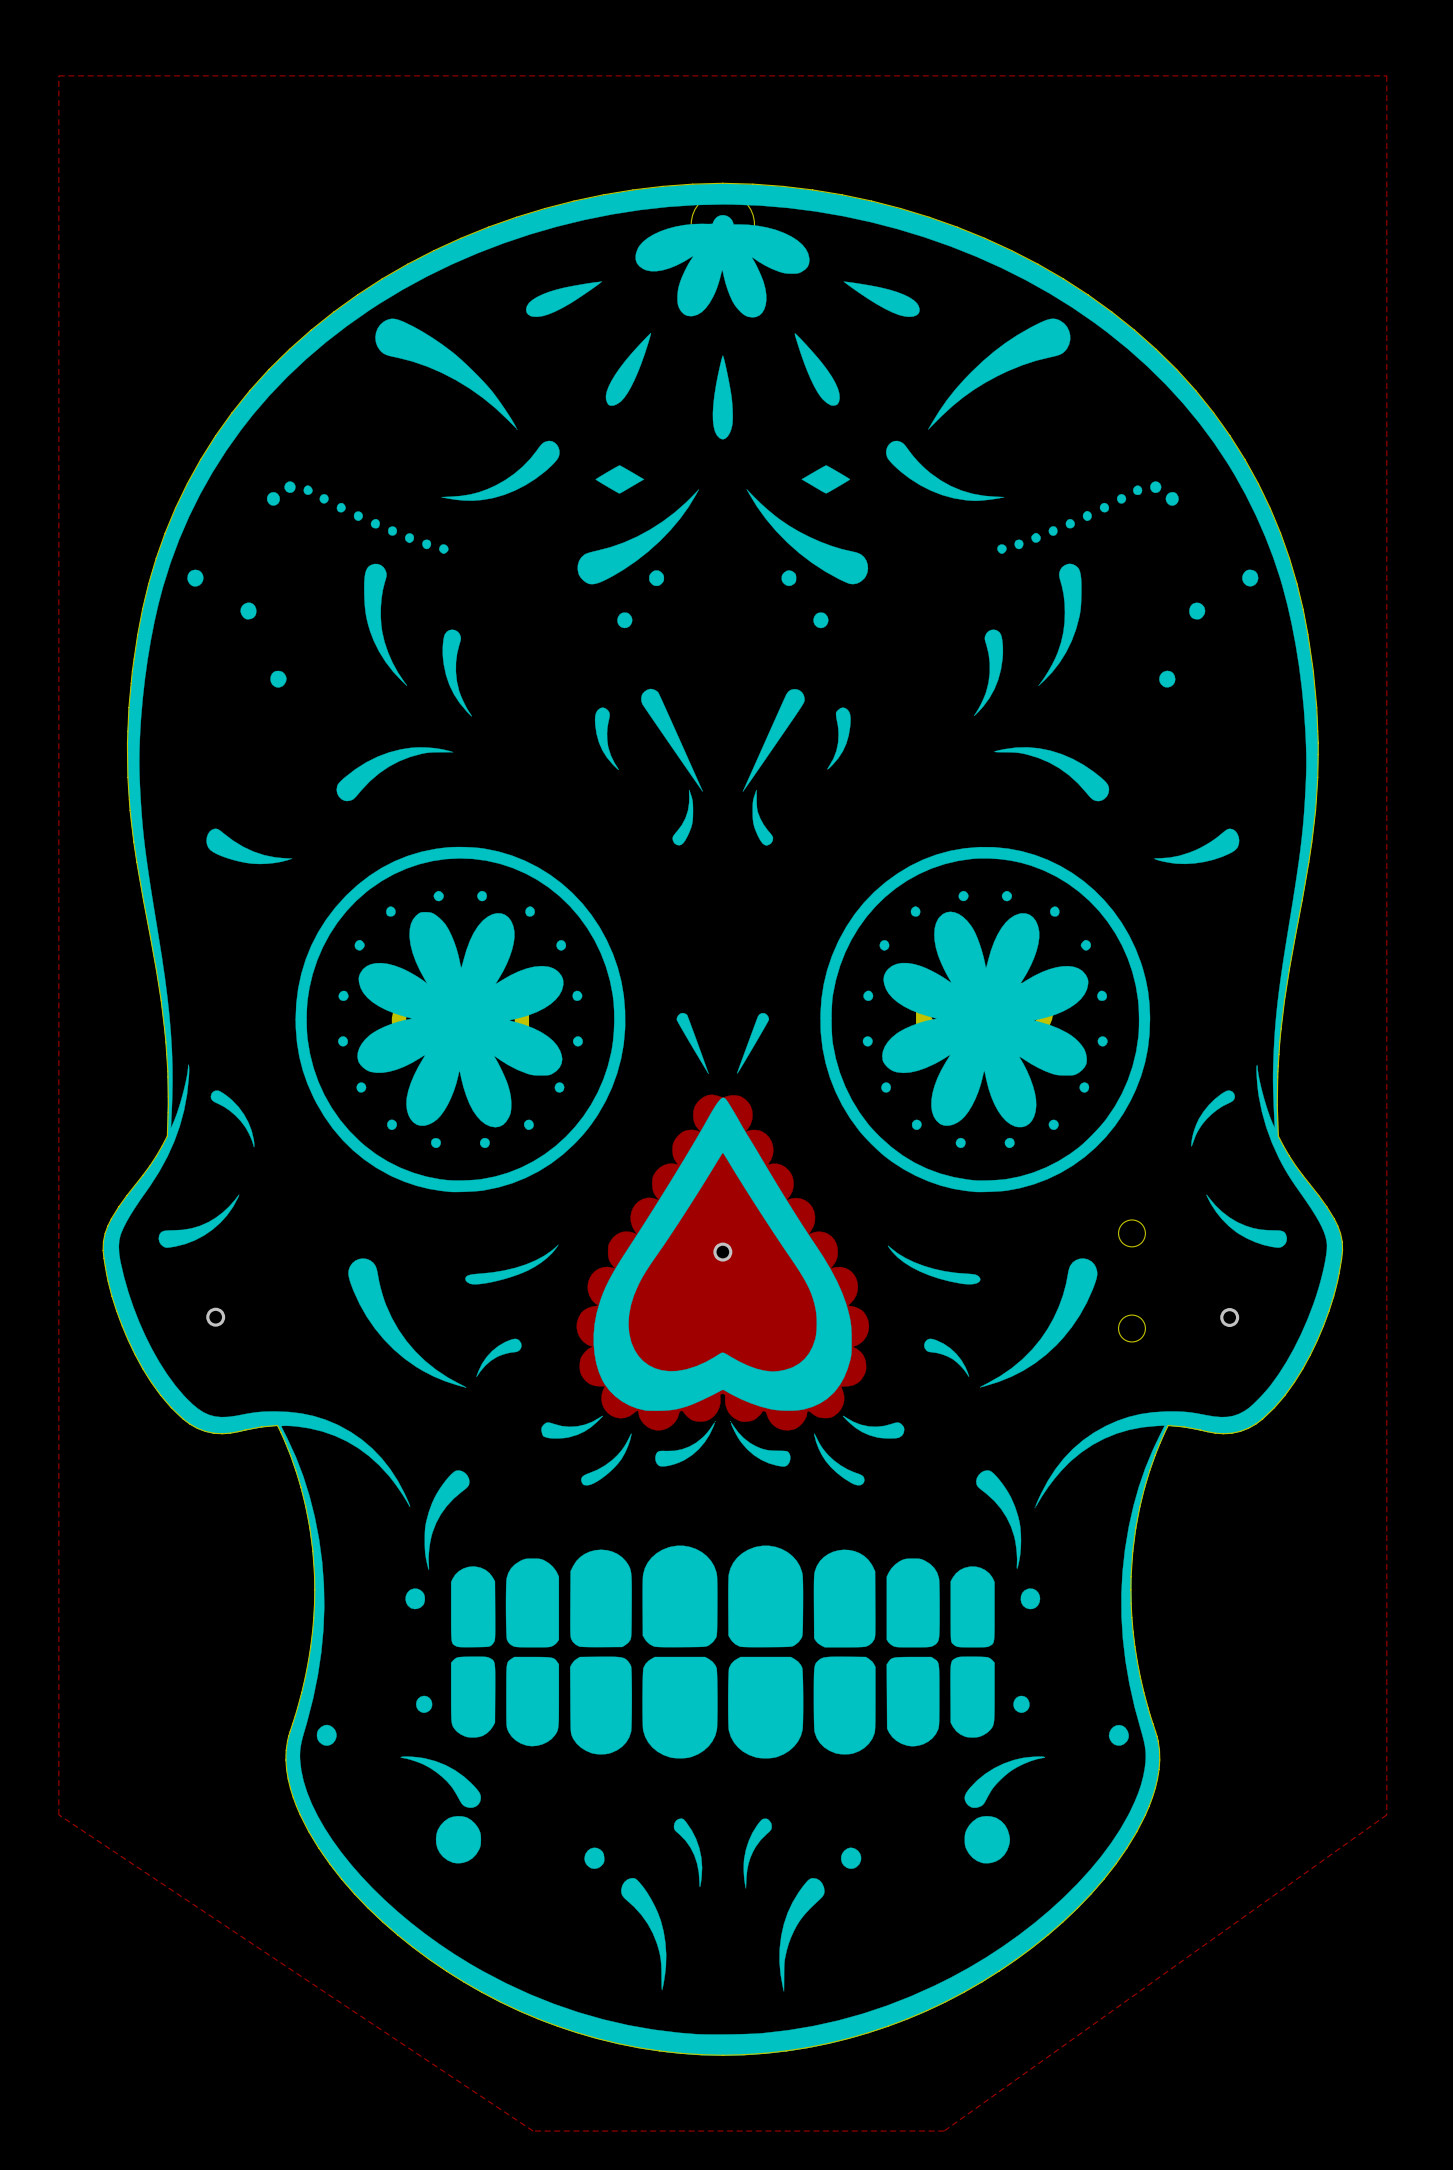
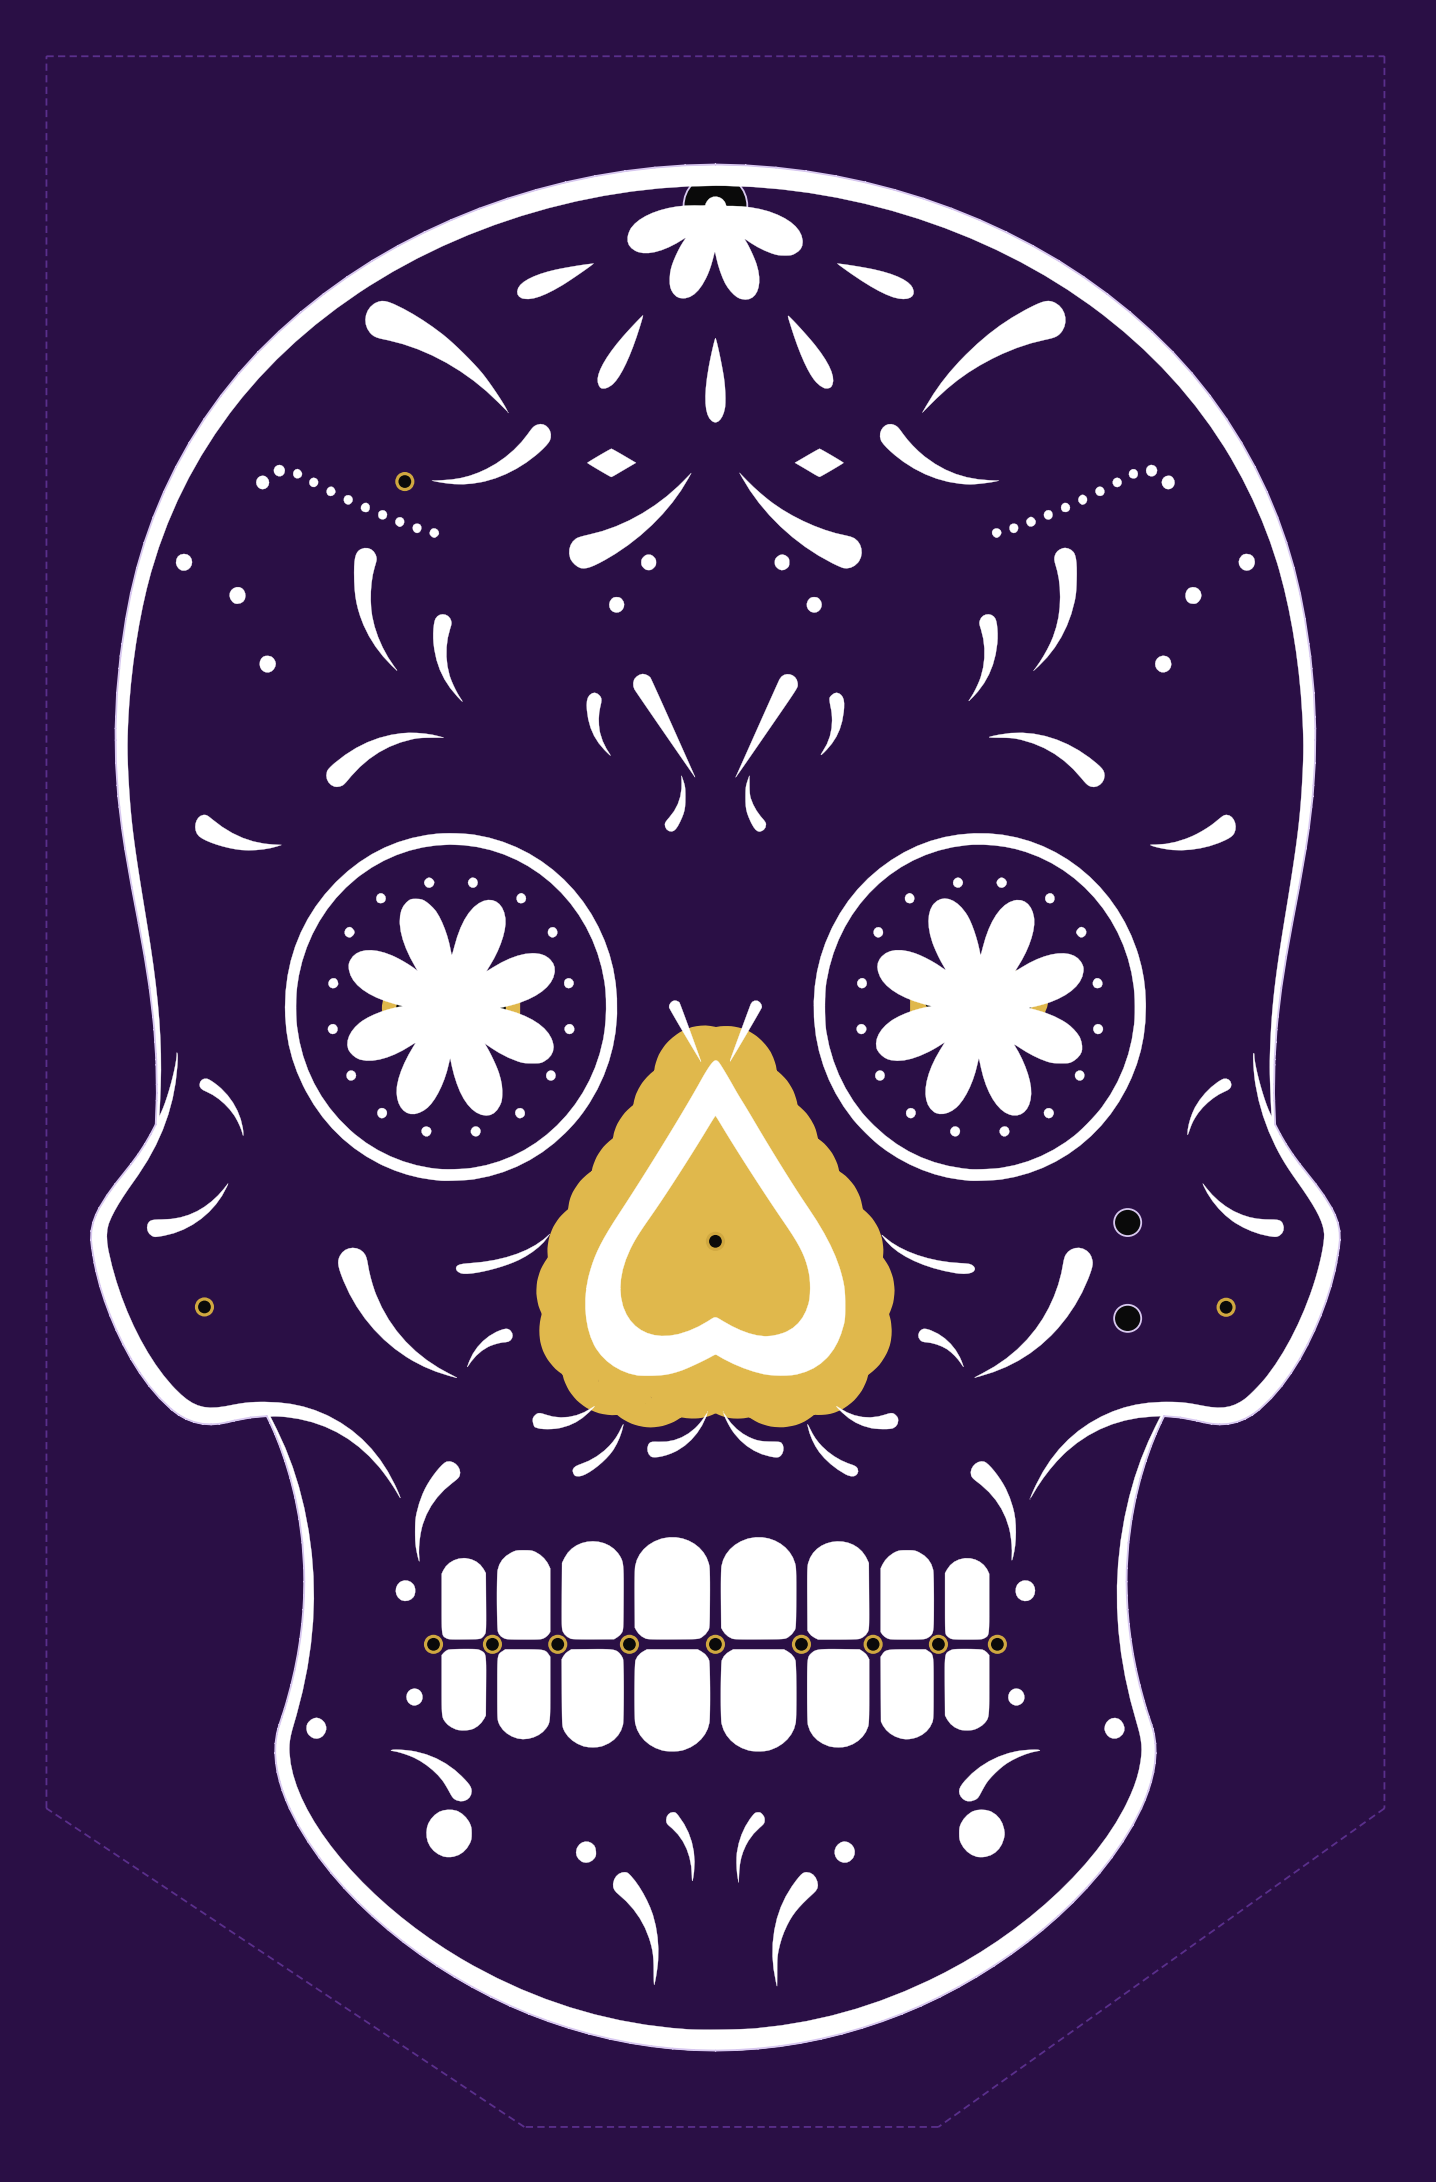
via: none -> (404, 481)
part footprint: [576, 1094, 870, 1431] -> [536, 1025, 895, 1428]
via: none -> (433, 1644)
via: none -> (492, 1644)
via: none -> (557, 1644)
via: none -> (629, 1644)
via: none -> (715, 1644)
via: none -> (801, 1644)
via: none -> (873, 1644)
via: none -> (938, 1644)
via: none -> (997, 1644)

